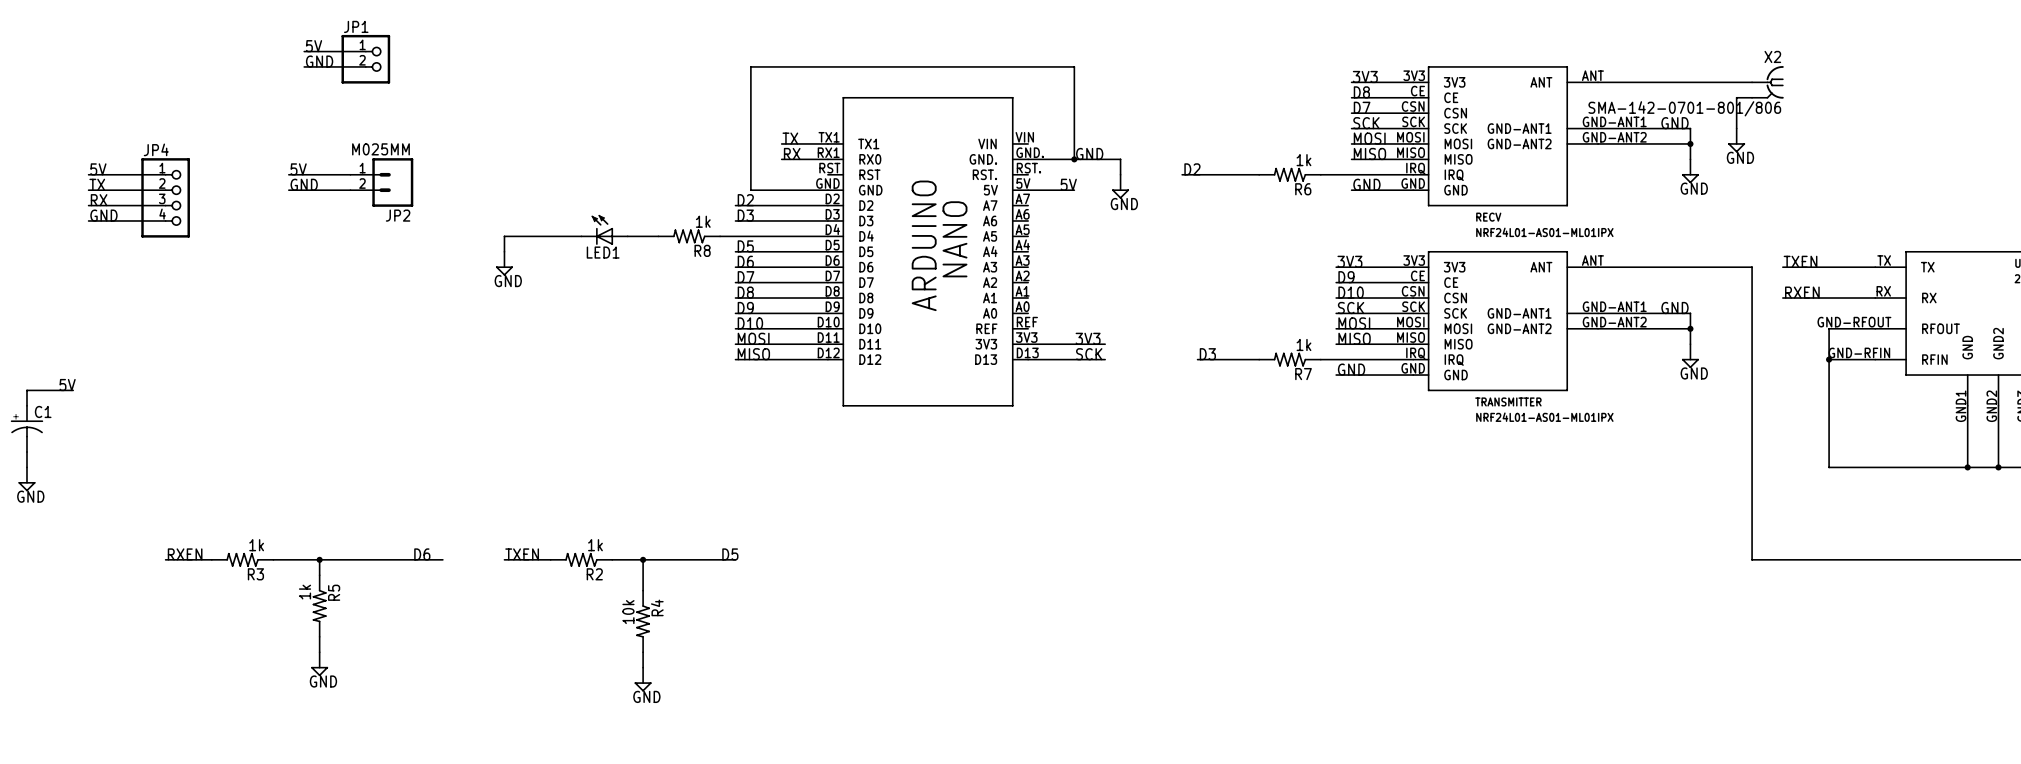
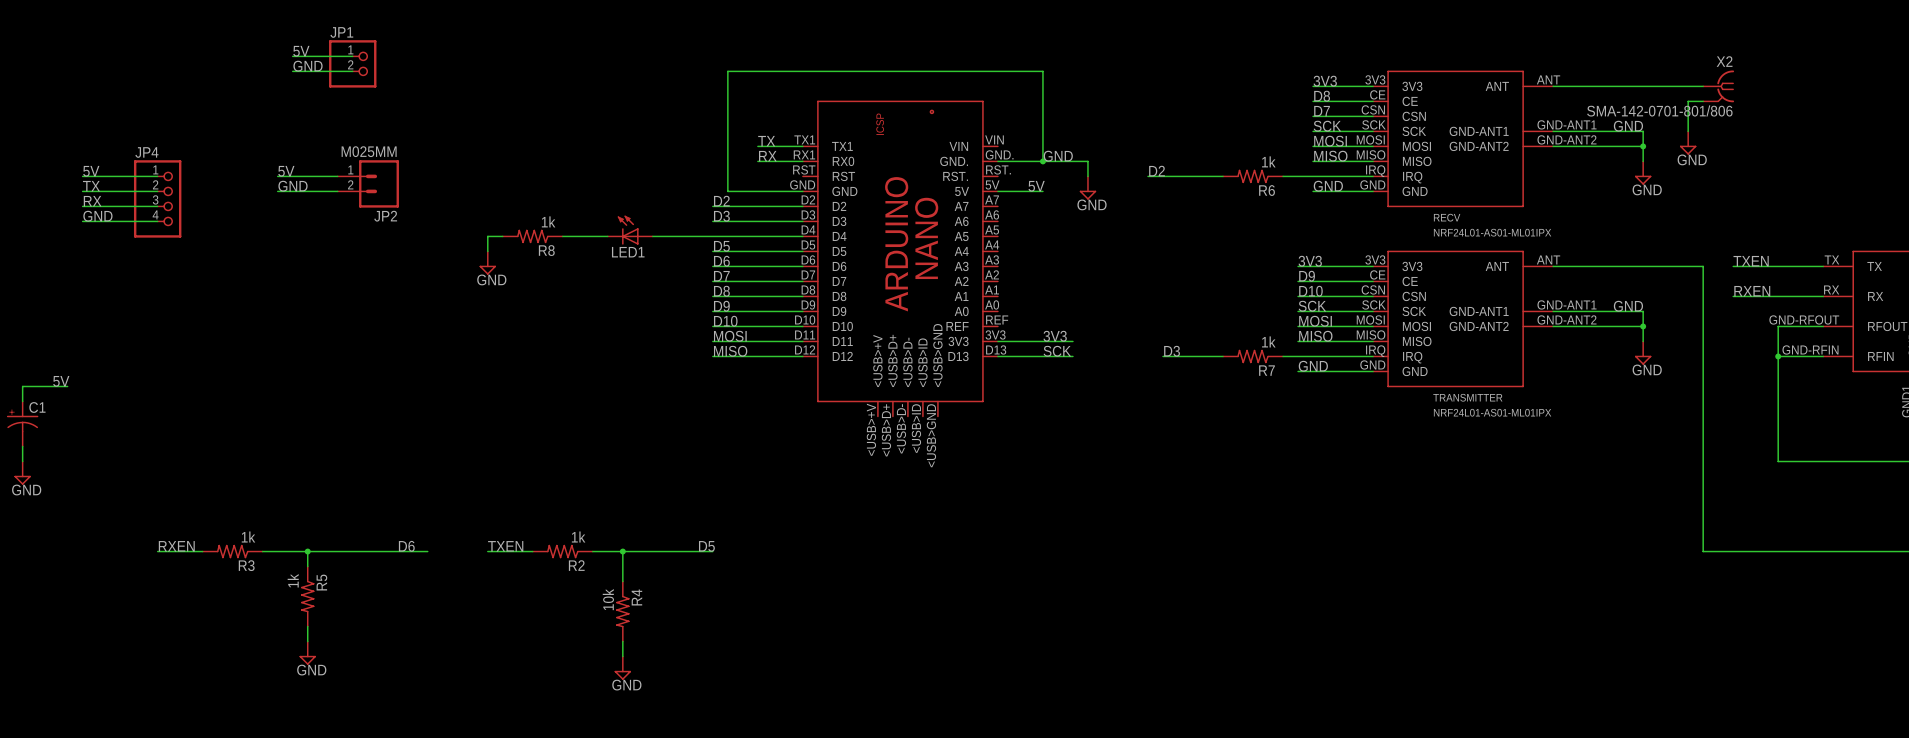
LED1 position: (604, 230) -> (630, 230)
R8 position: (689, 236) -> (532, 236)
part: (928, 251) -> none
part: none -> (900, 258)

